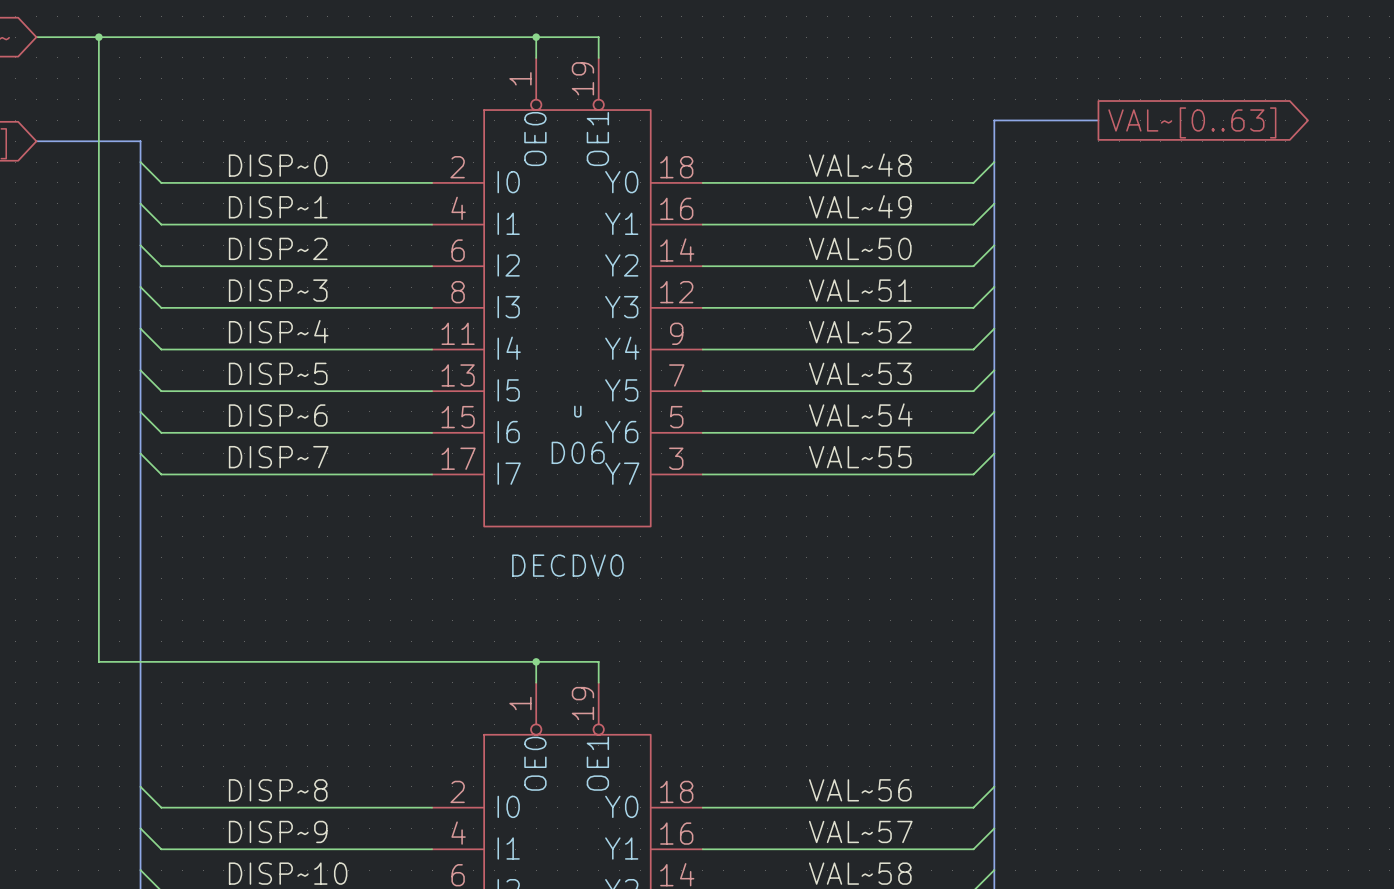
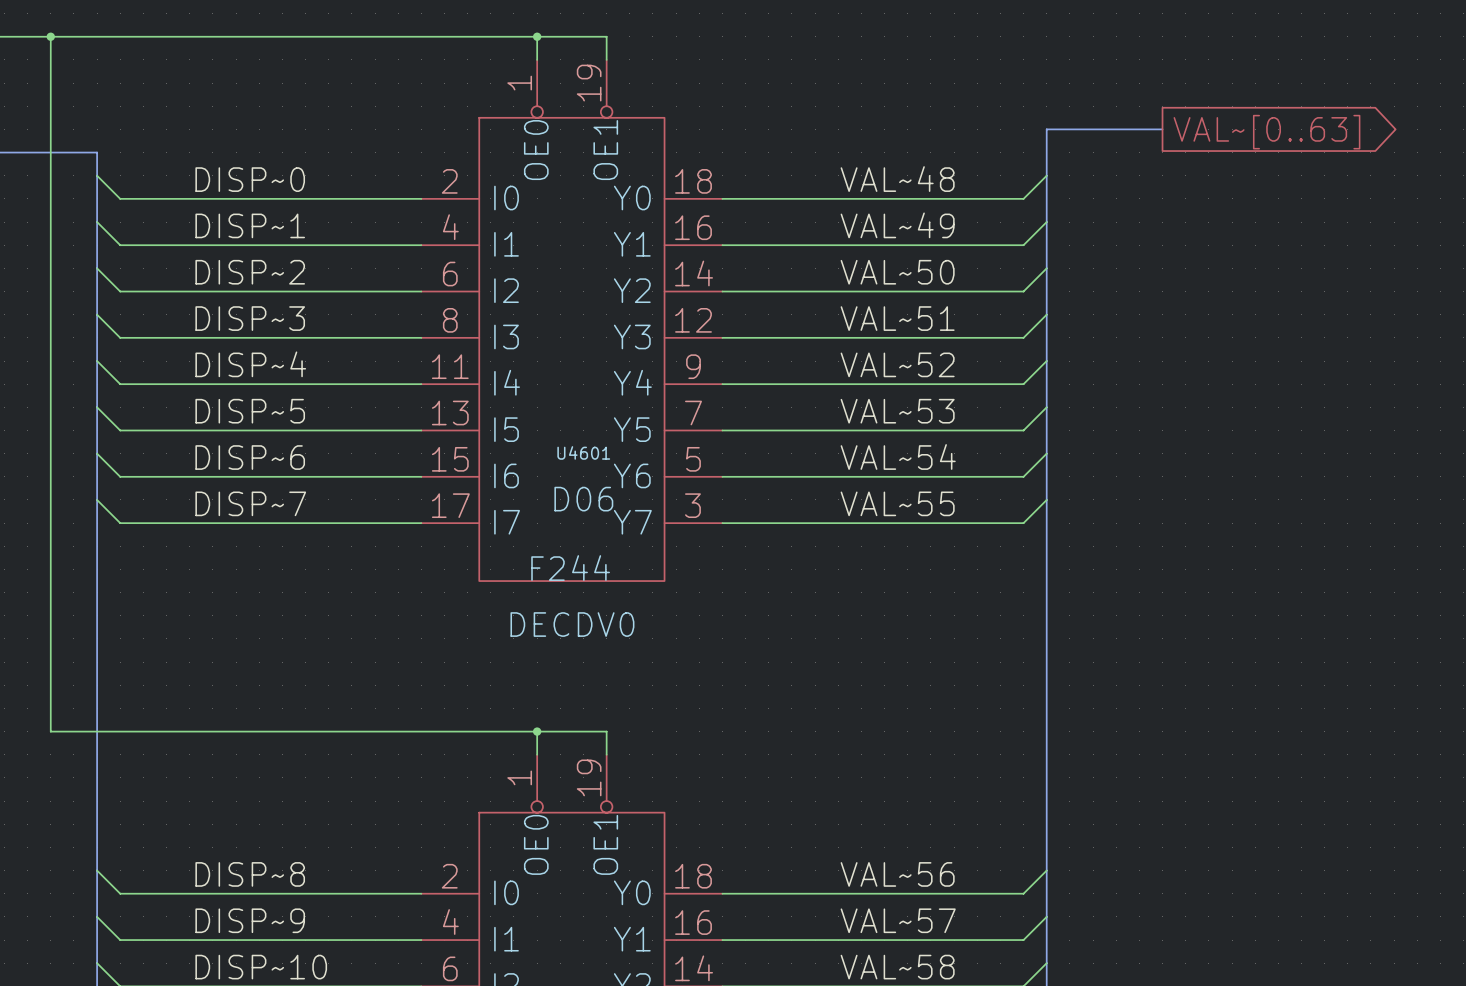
U name: U (577, 411) -> U4601 (583, 452)
U value: none -> F244 (570, 568)

